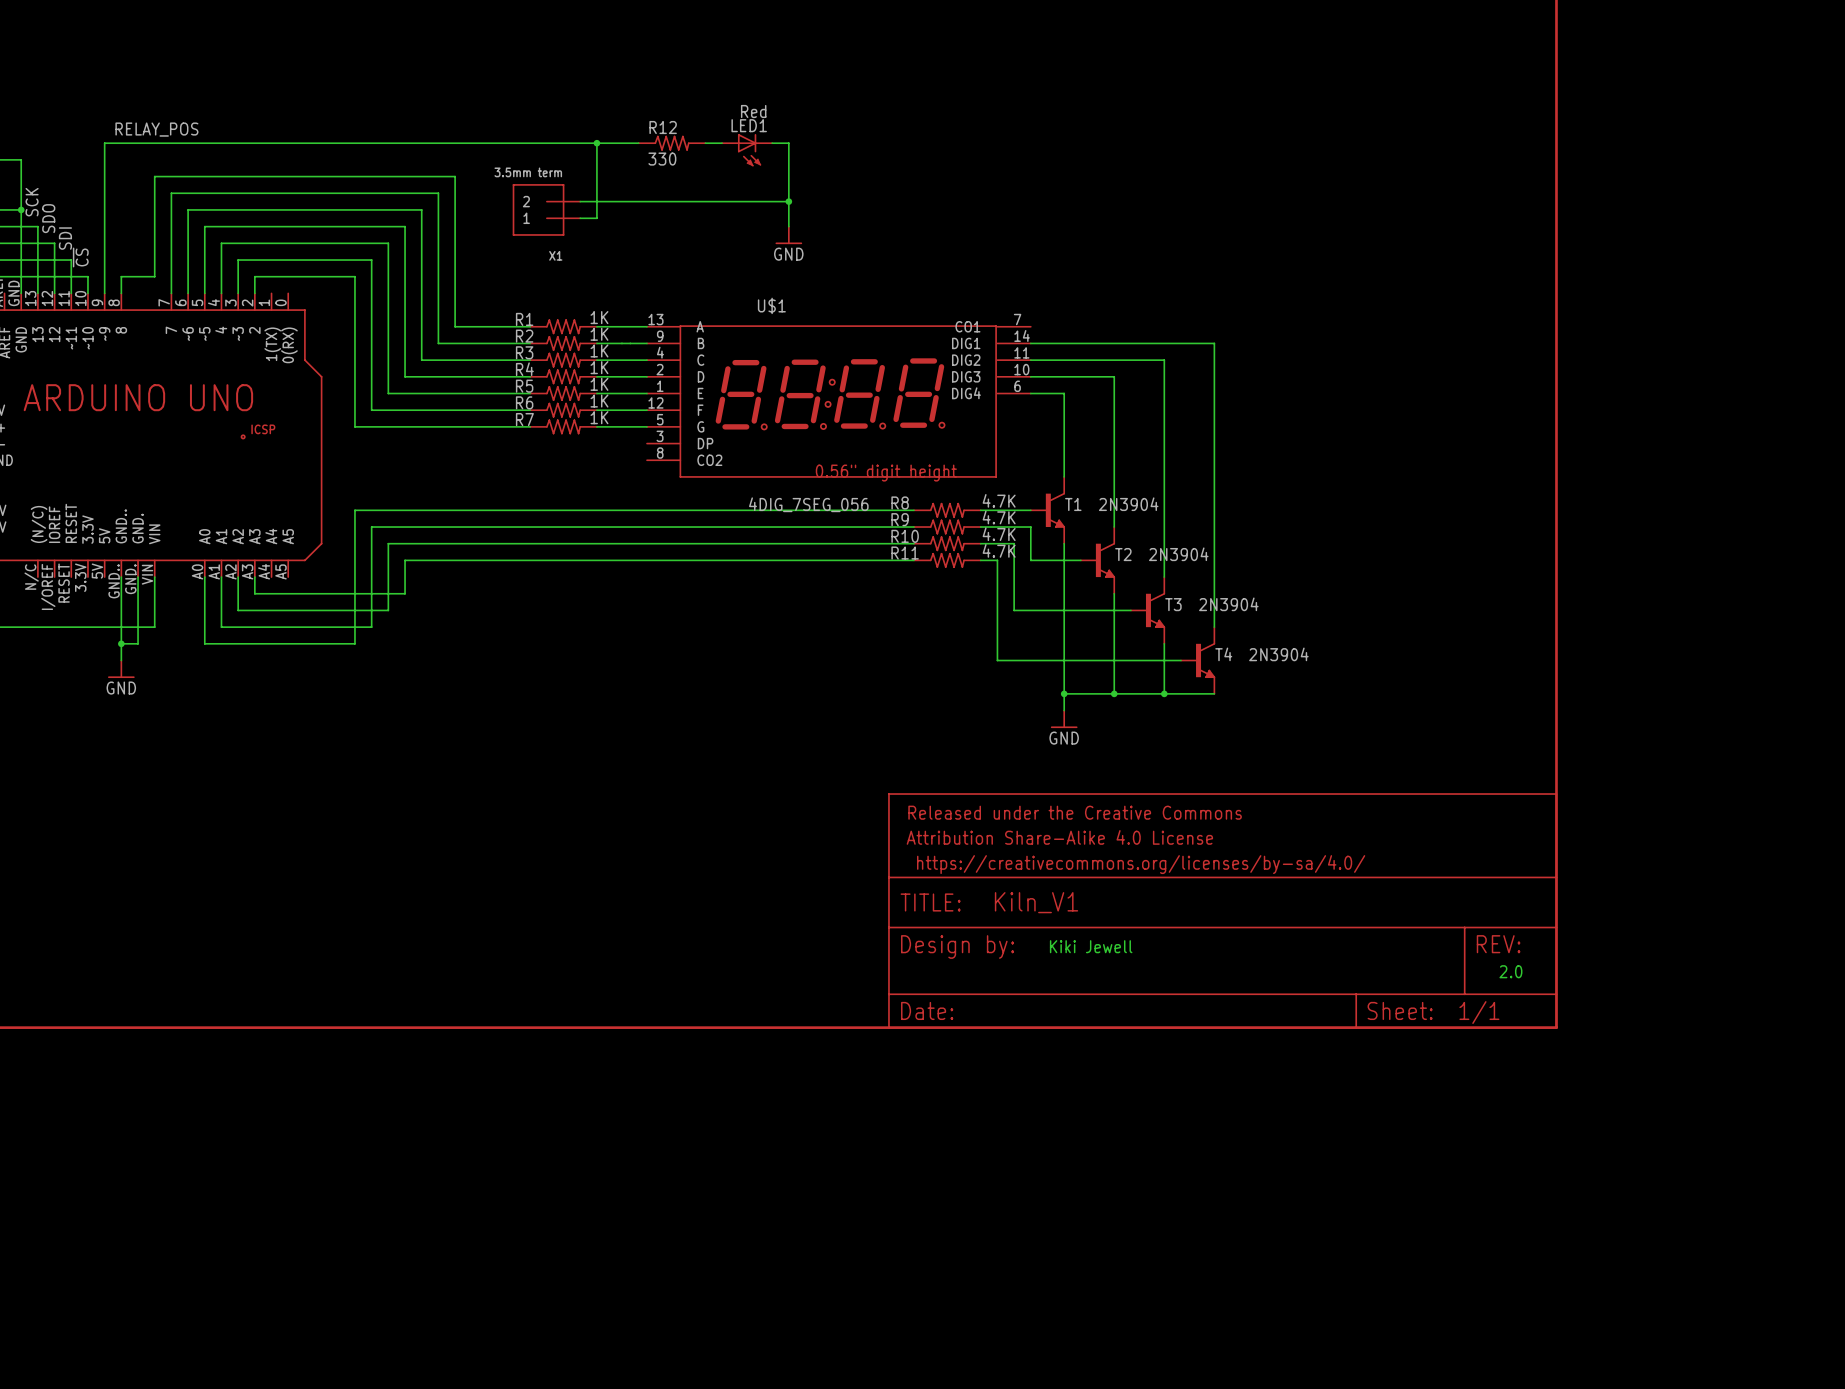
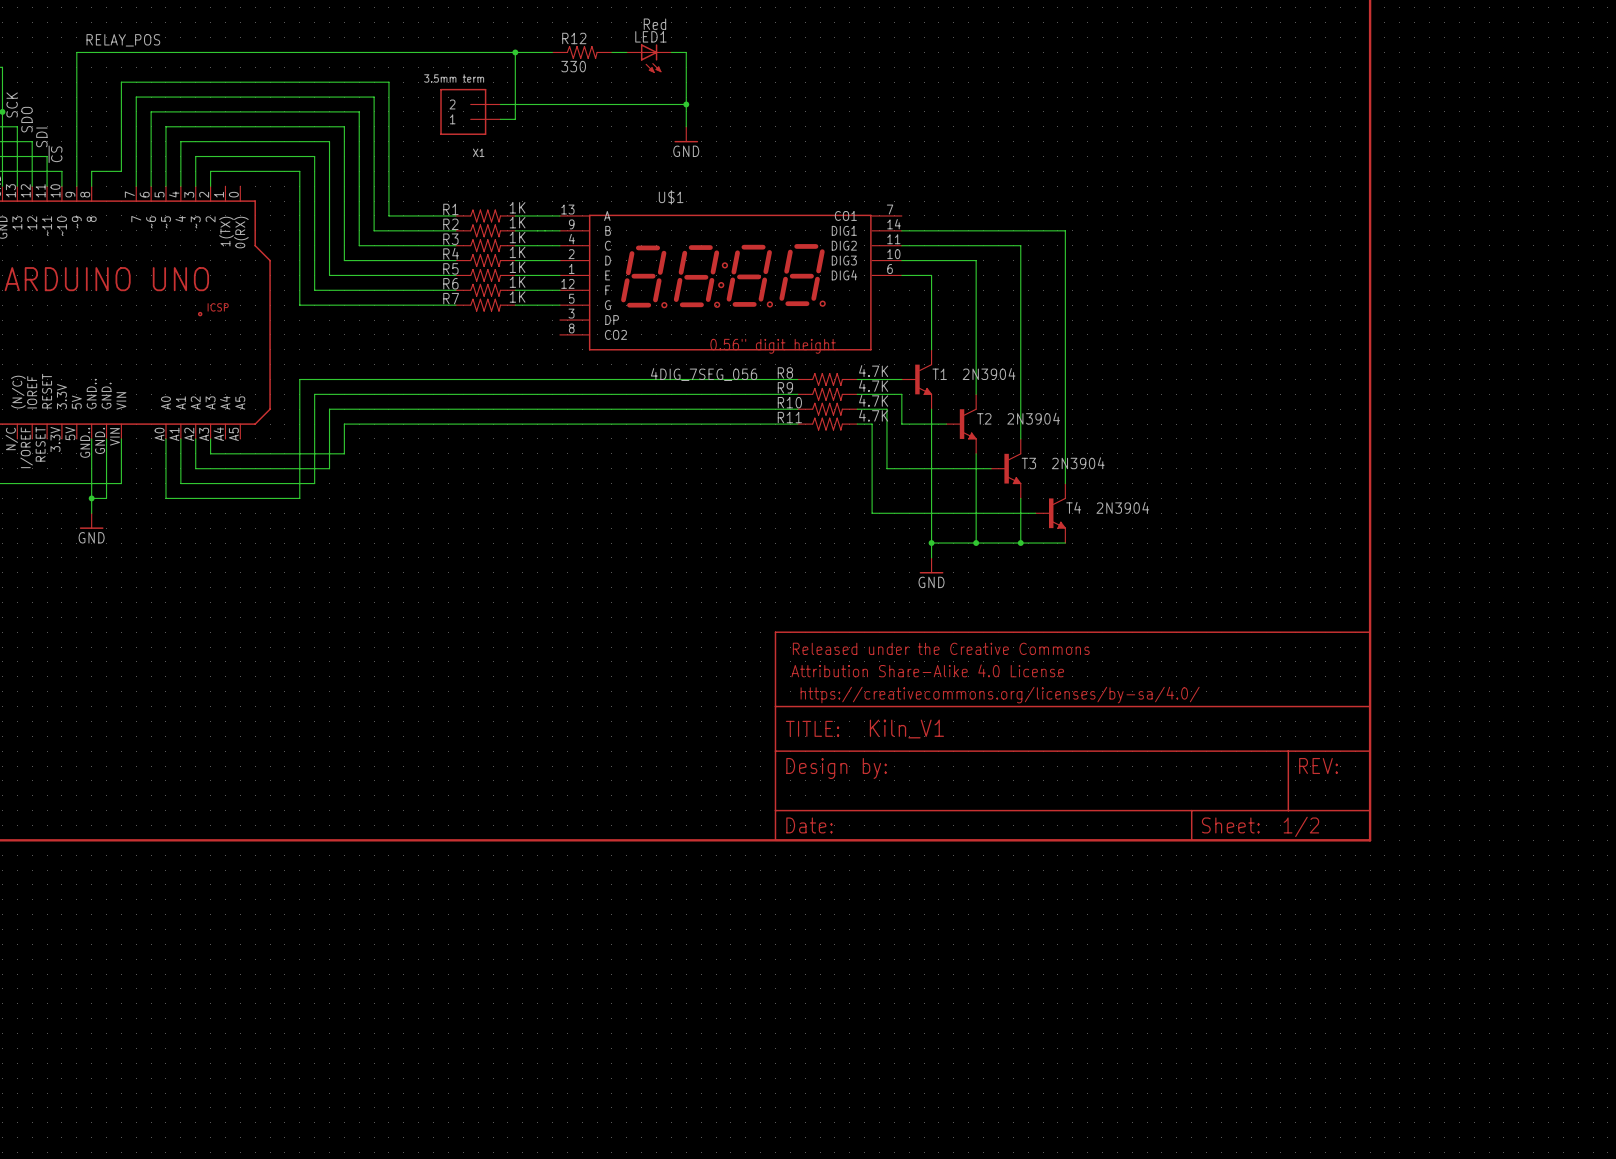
text: Kiki Jewell (1091, 946) -> none
text: 2.0 (1510, 971) -> none
part text: 1/1 (1479, 1012) -> 1/2 (1301, 826)

